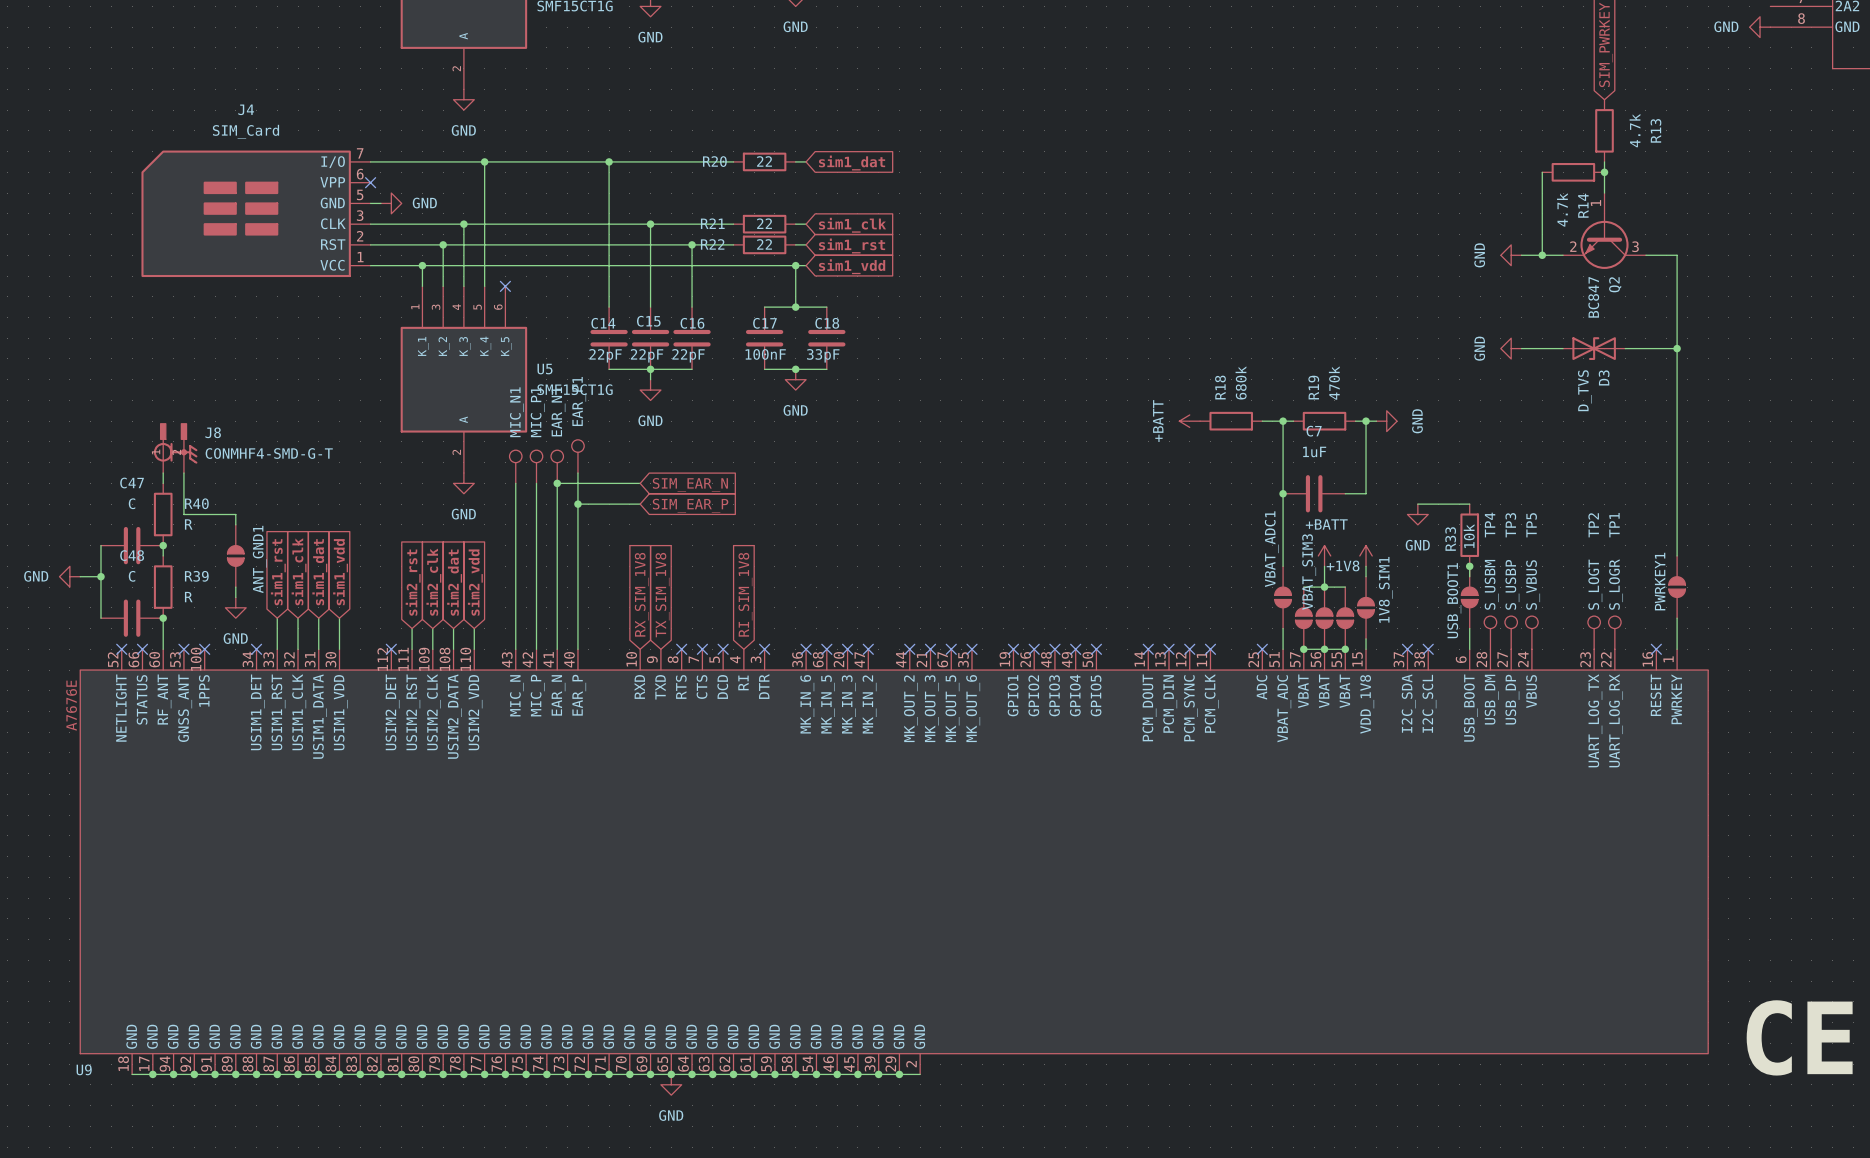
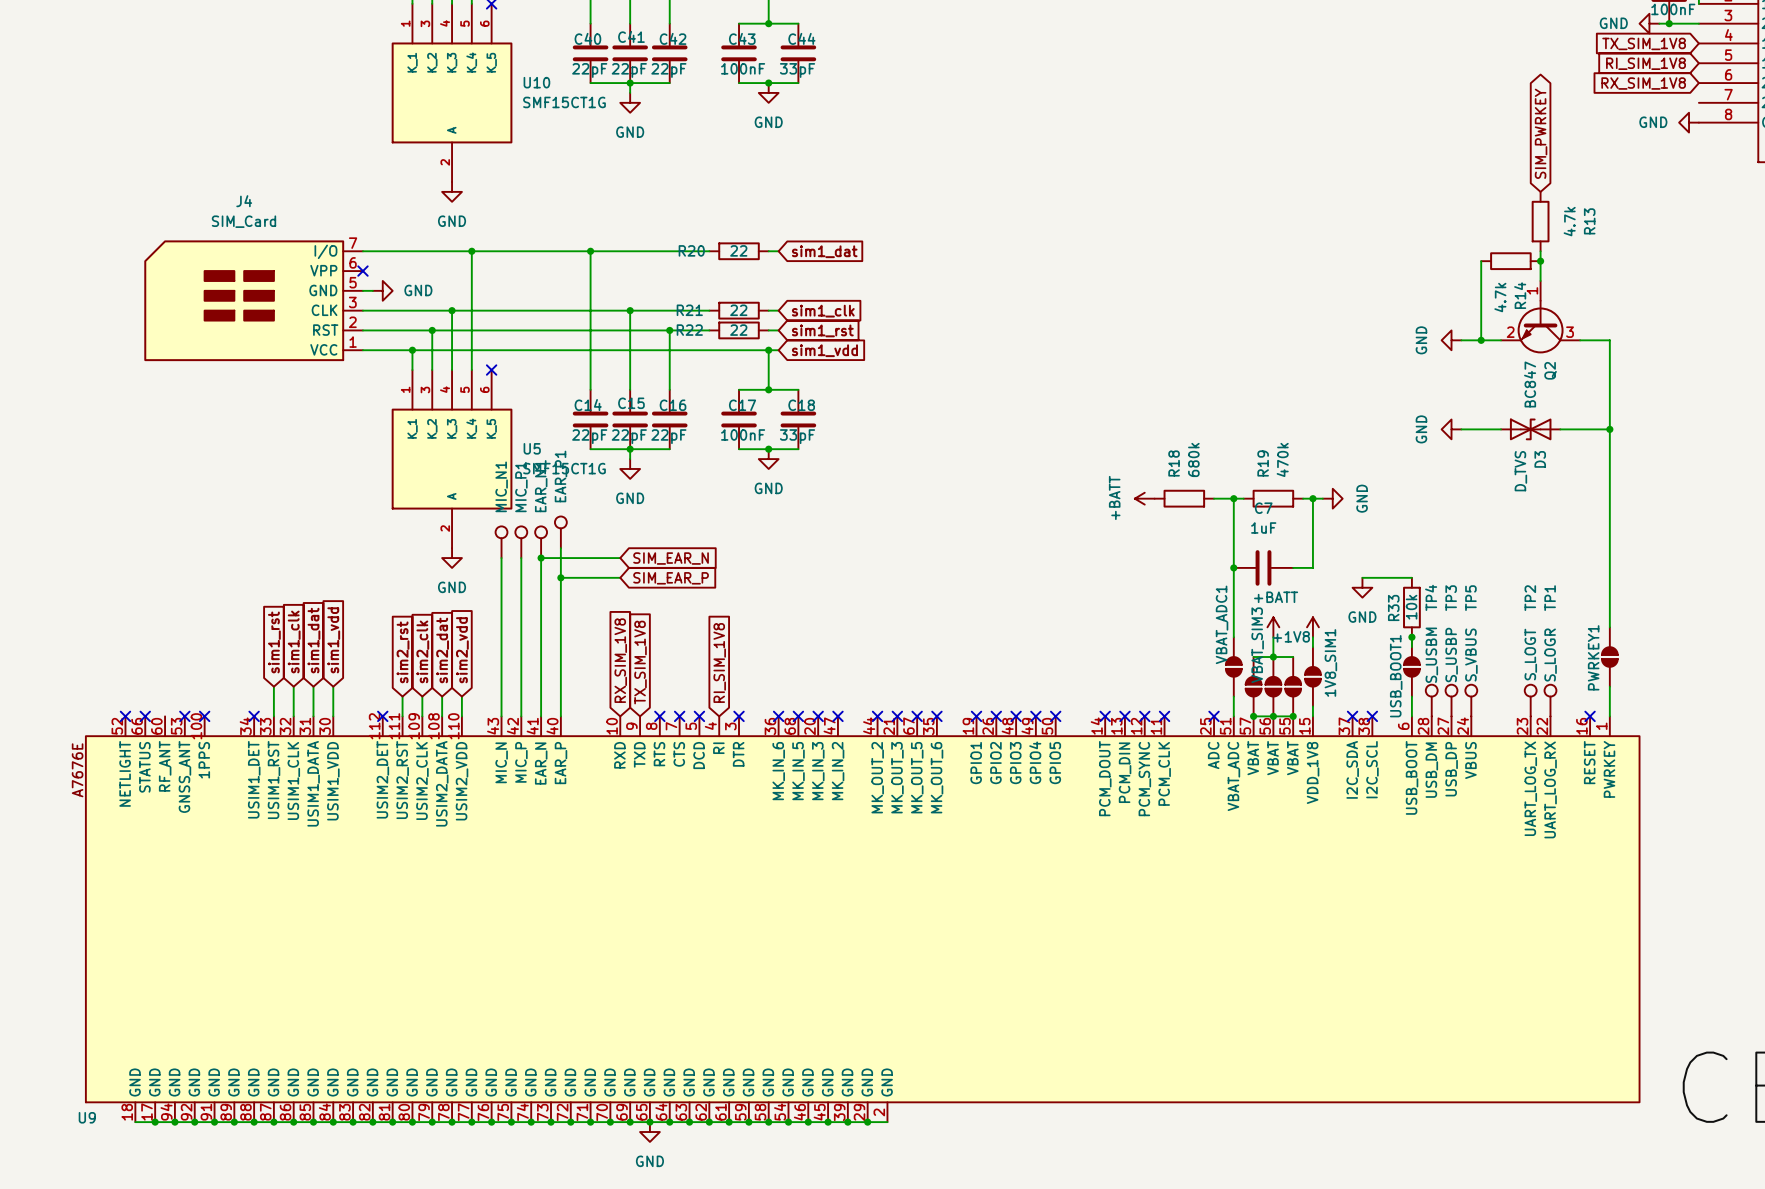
J8: CONMHF4-SMD-G-T (175, 448) -> none
wire: (163, 473) (163, 483) -> none
wire: (183, 473) (183, 514) (235, 514) (235, 524) -> none
R40: R (163, 514) -> none
wire: (100, 545) (100, 618) -> none
C47: C (132, 545) -> none
wire: (163, 545) (163, 555) -> none
junction: (163, 545) -> none
ANT_GND1: (235, 555) -> none
power symbol: GND (69, 576) -> none
wire: (80, 576) (100, 576) -> none
junction: (100, 576) -> none
R39: R (163, 587) -> none
wire: (235, 587) (235, 597) -> none
power symbol: GND (235, 607) -> none
C48: C (132, 618) -> none
wire: (163, 618) (163, 649) -> none
junction: (163, 618) -> none

